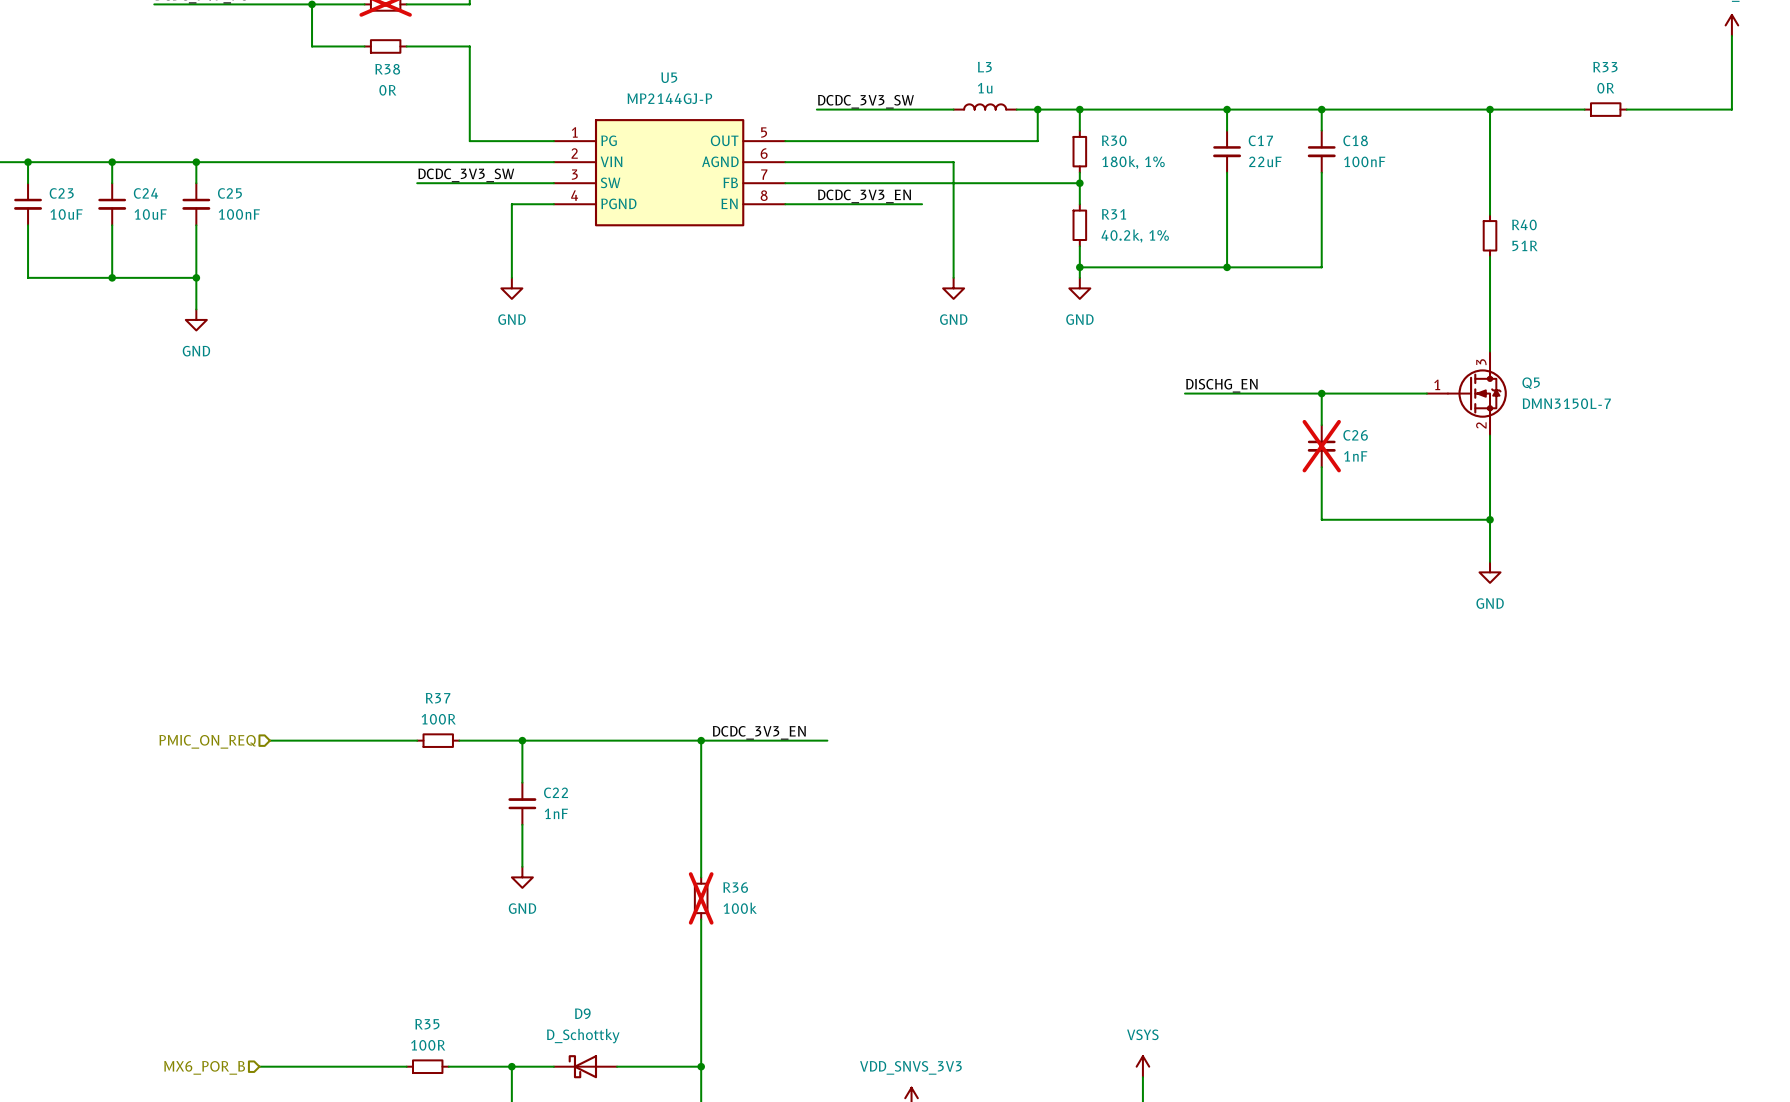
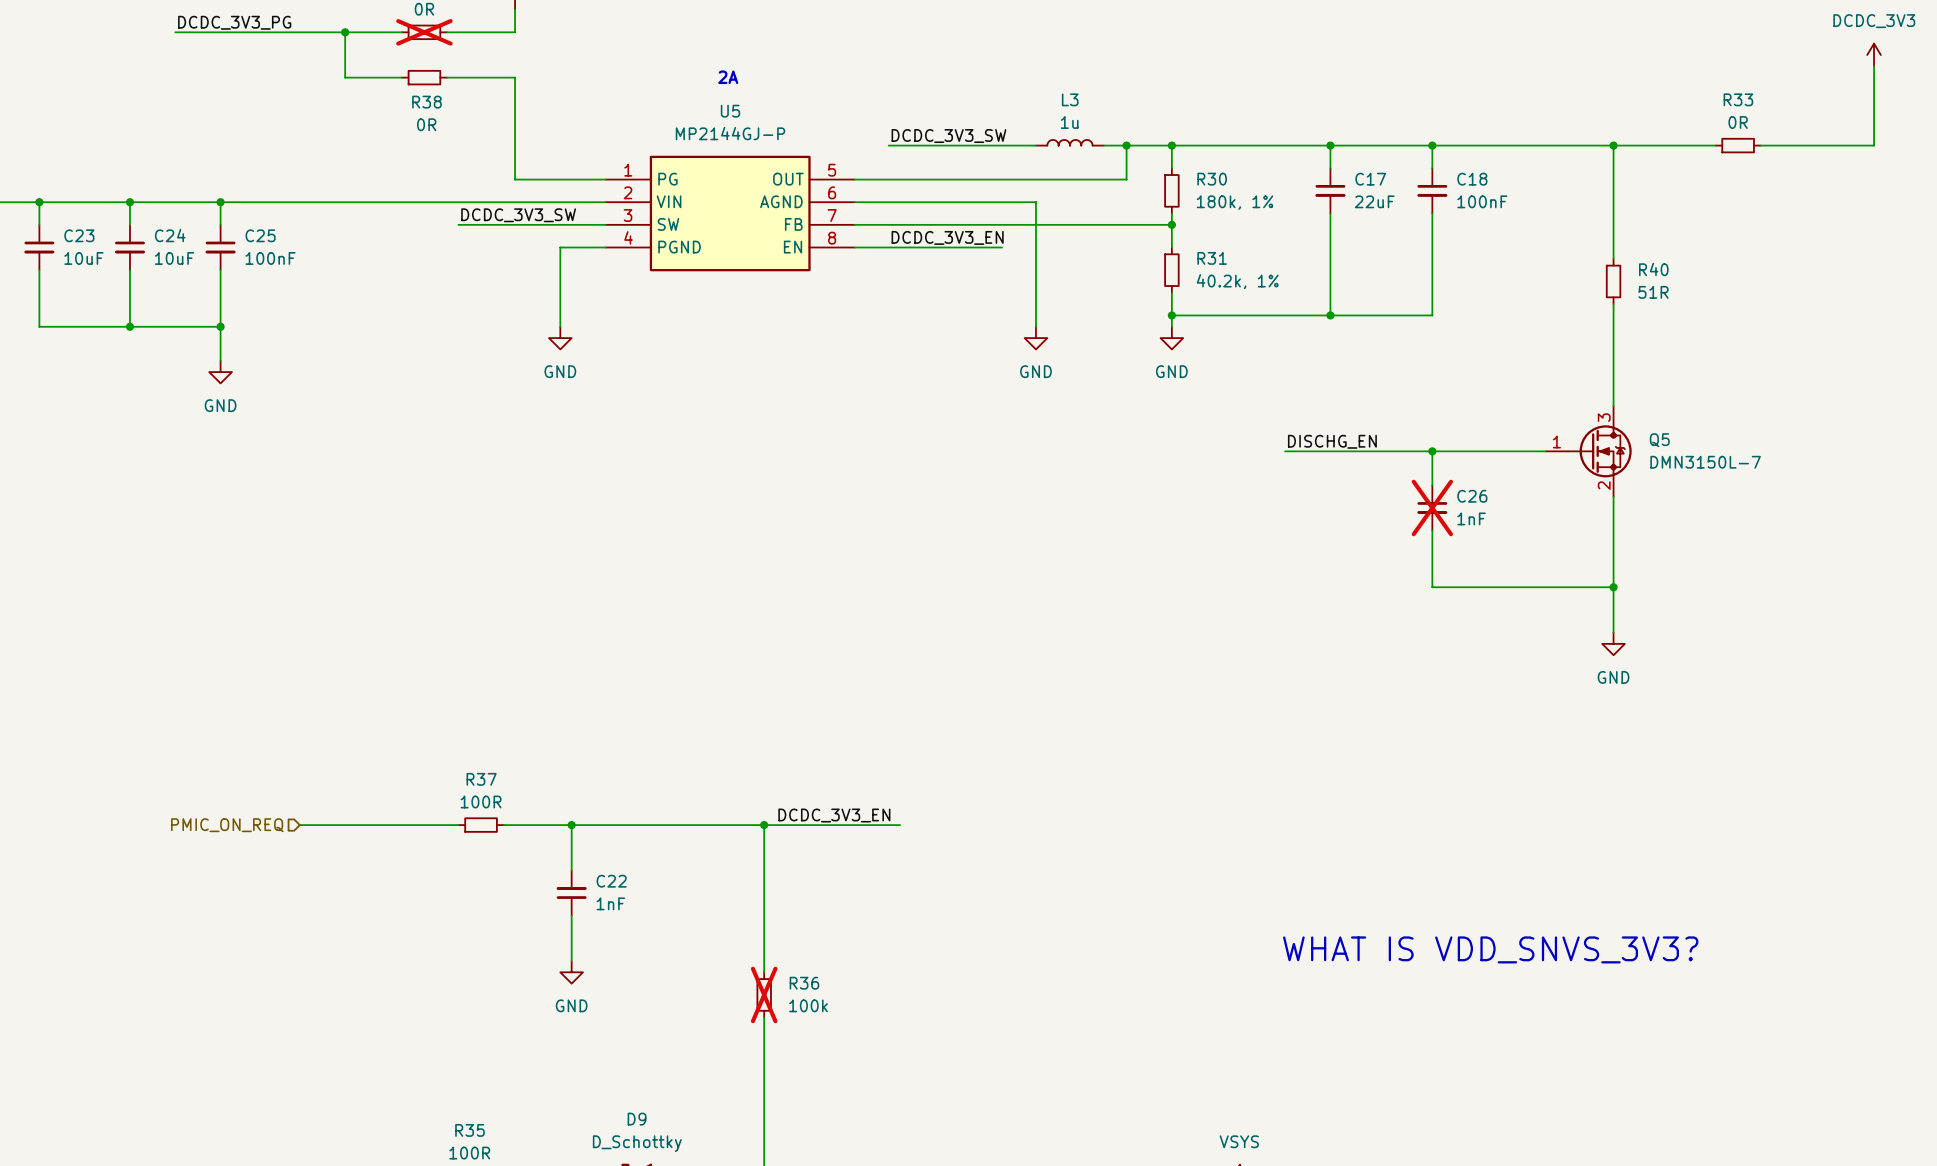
text: none -> 2A (728, 77)
text: none -> WHAT IS VDD_SNVS_3V3? (1490, 949)

